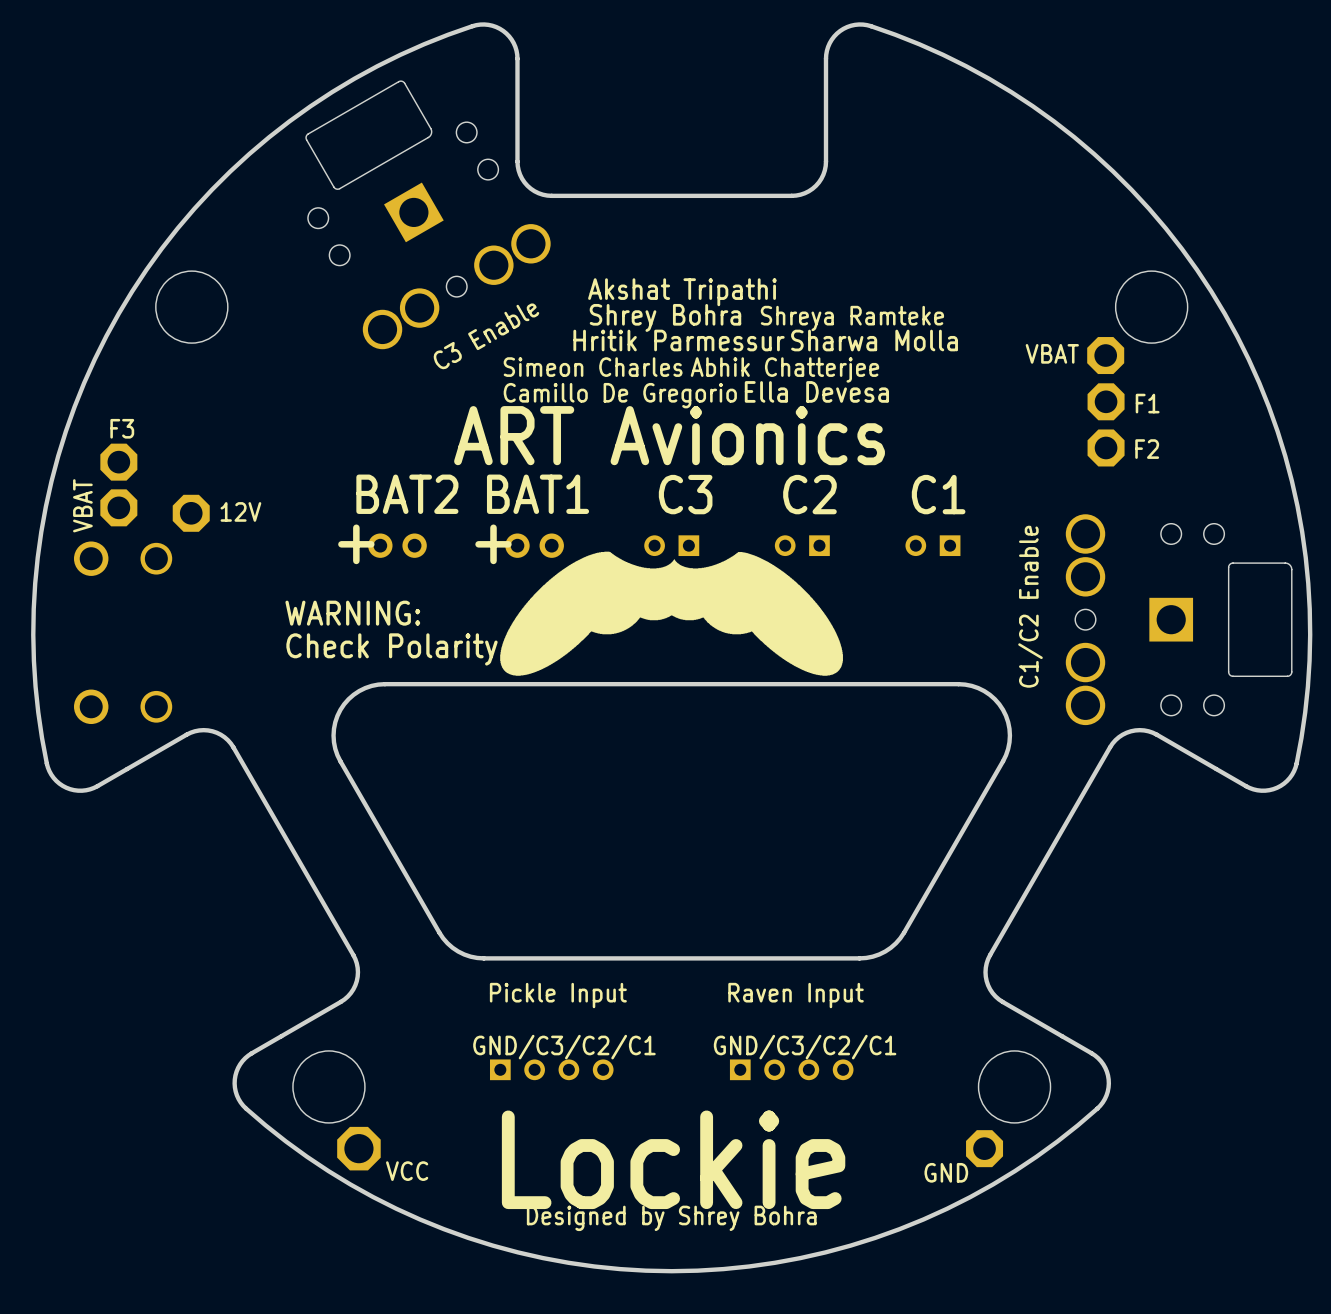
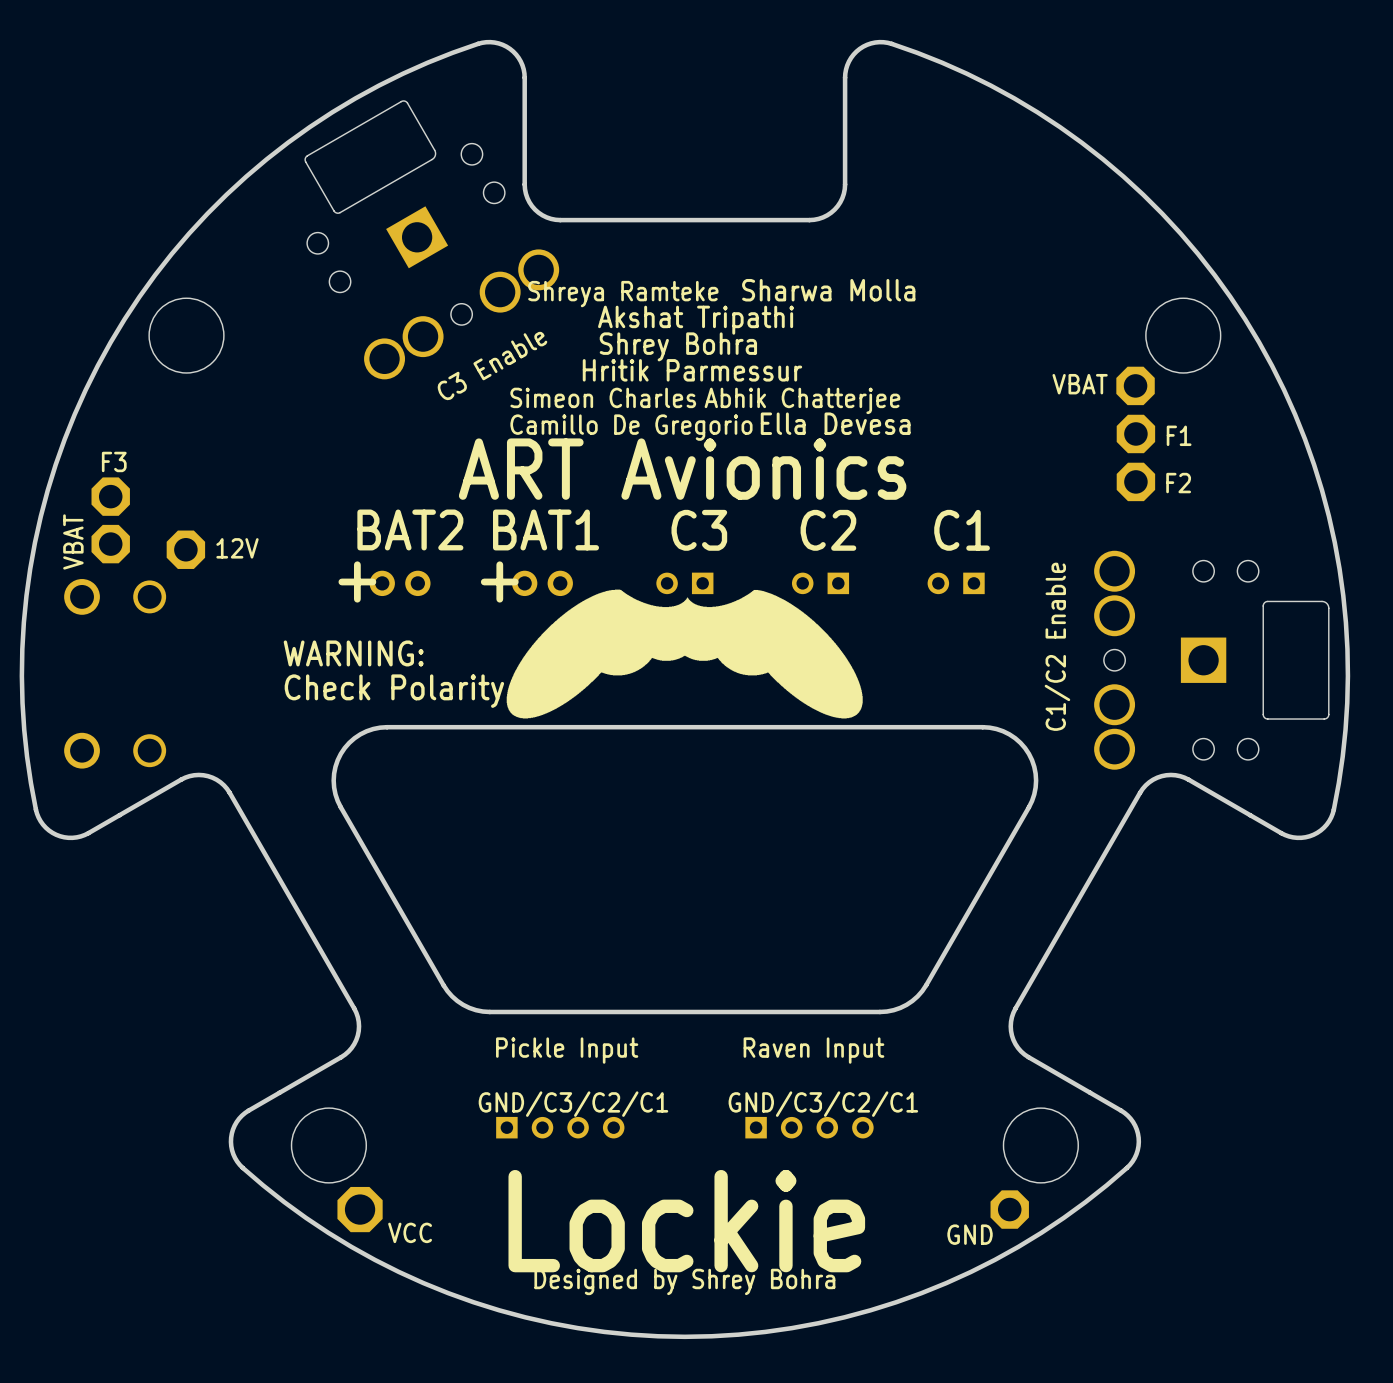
text position: Shreya Ramteke (852, 318) -> Shreya Ramteke (623, 294)
text position: Sharwa Molla (874, 340) -> Sharwa Molla (828, 290)

